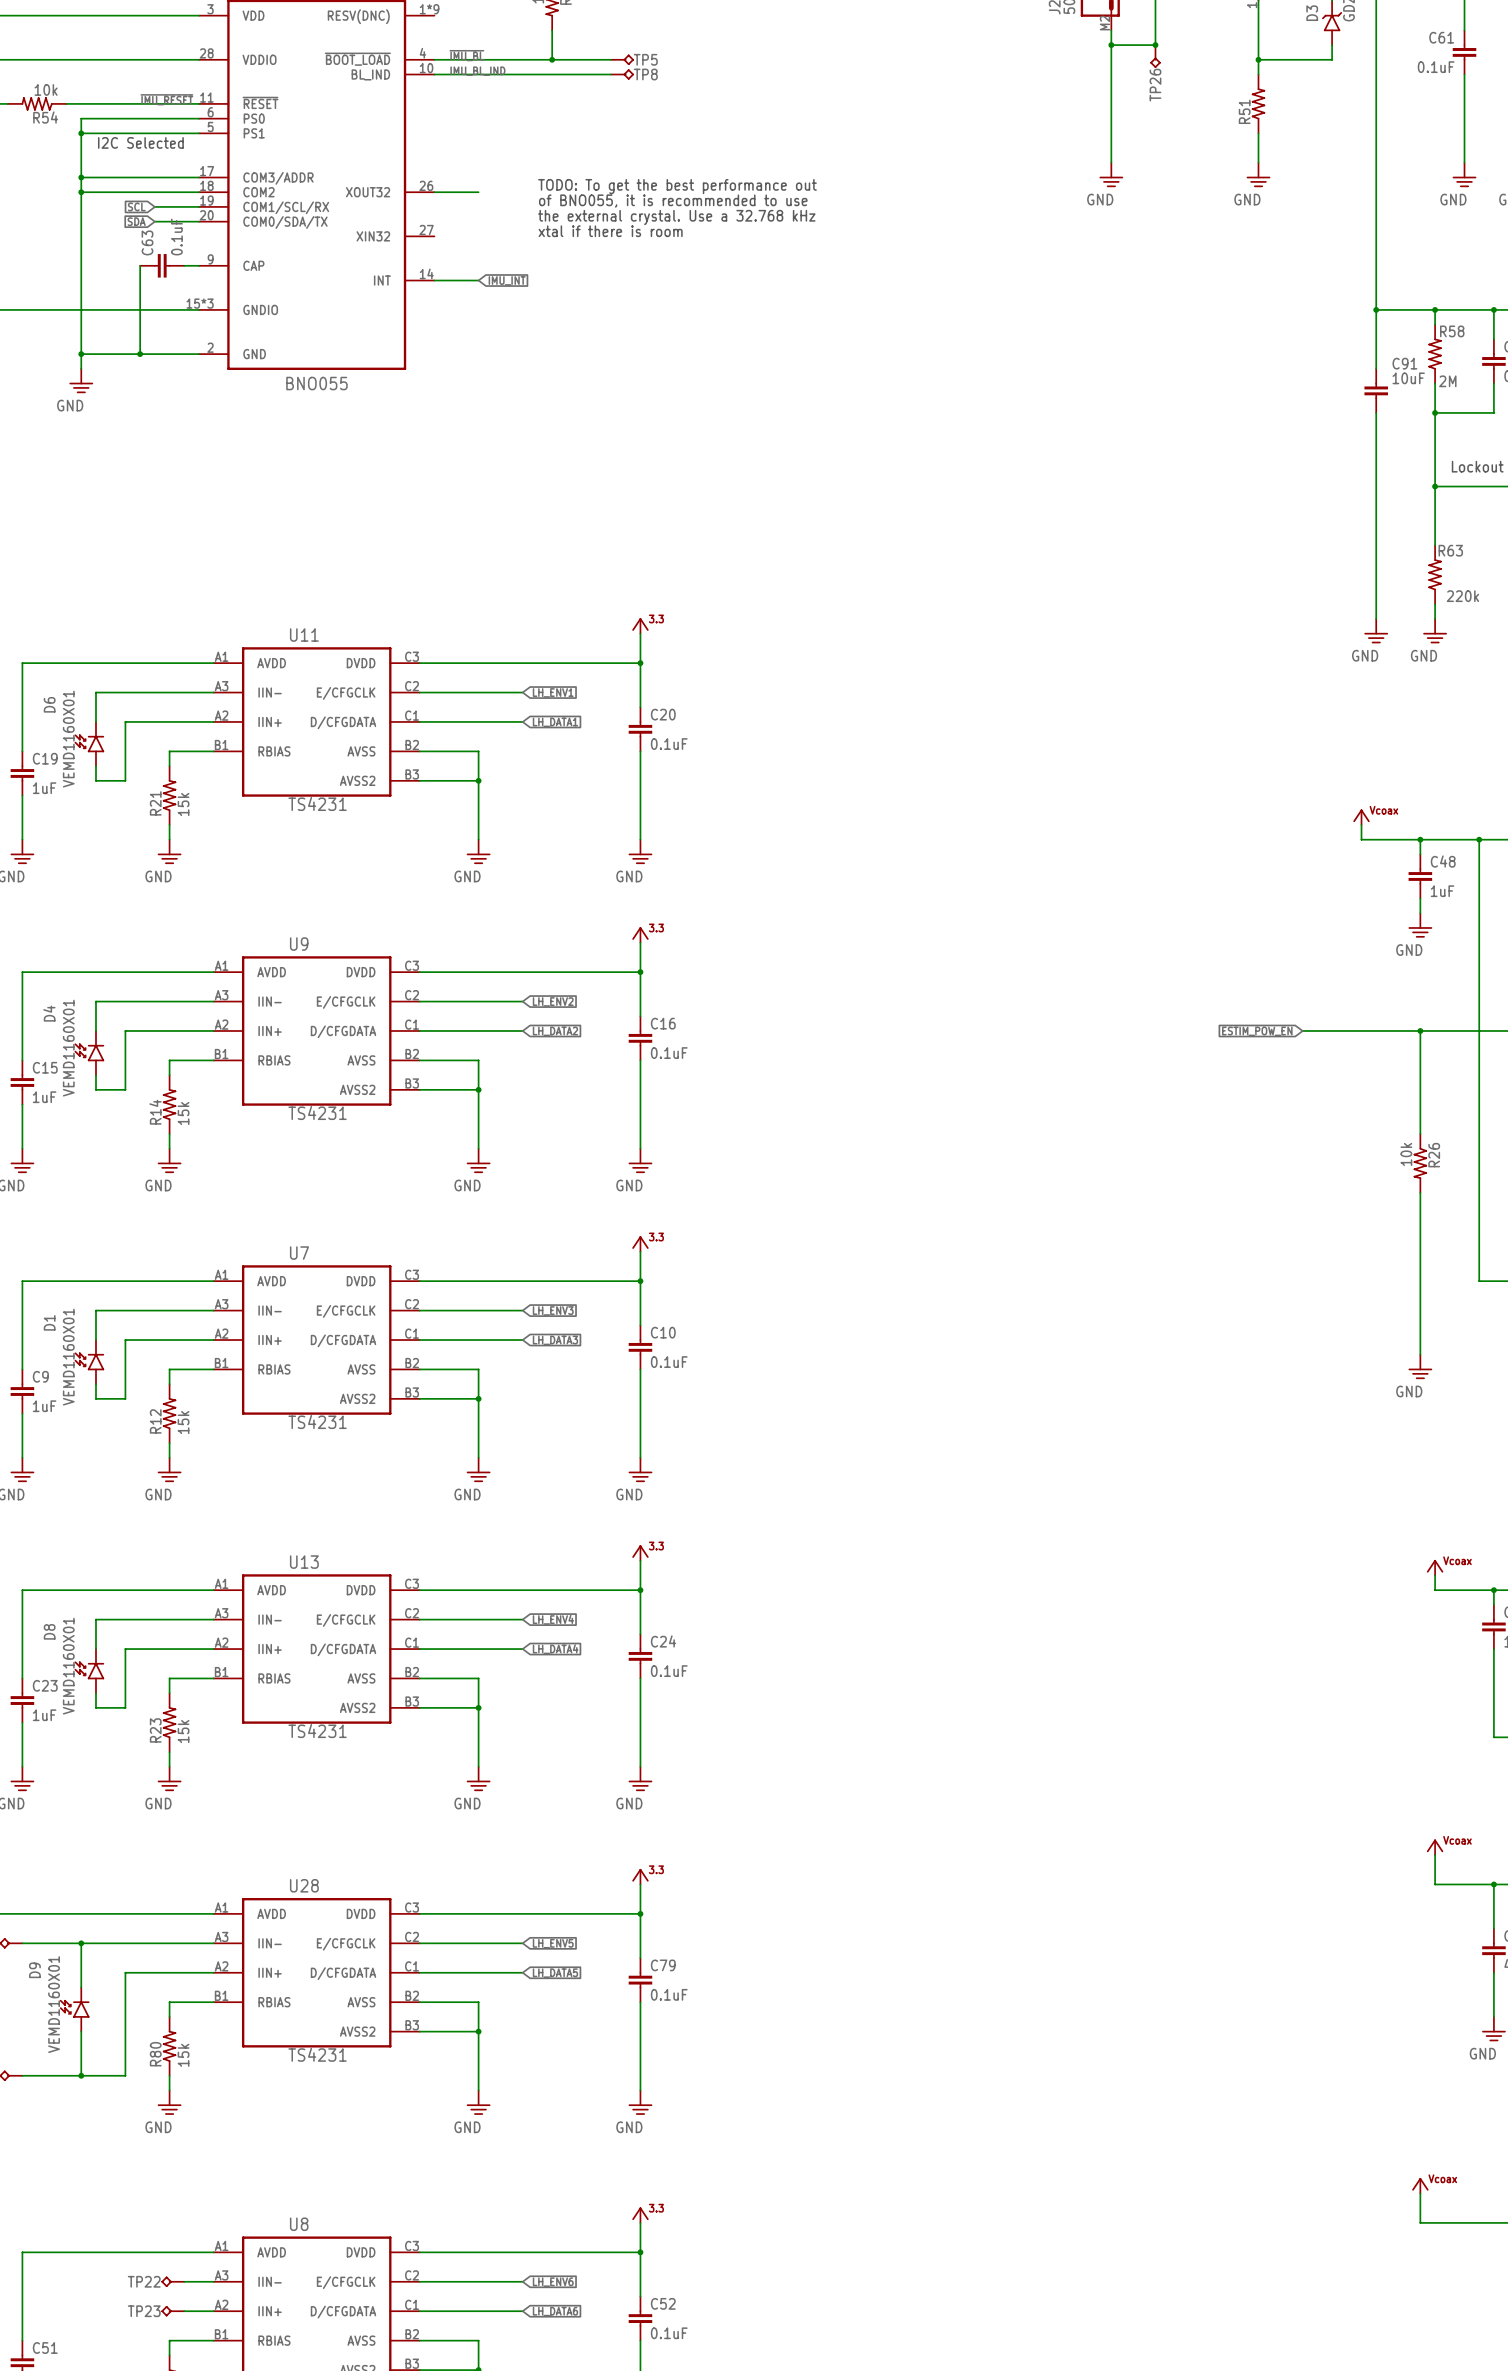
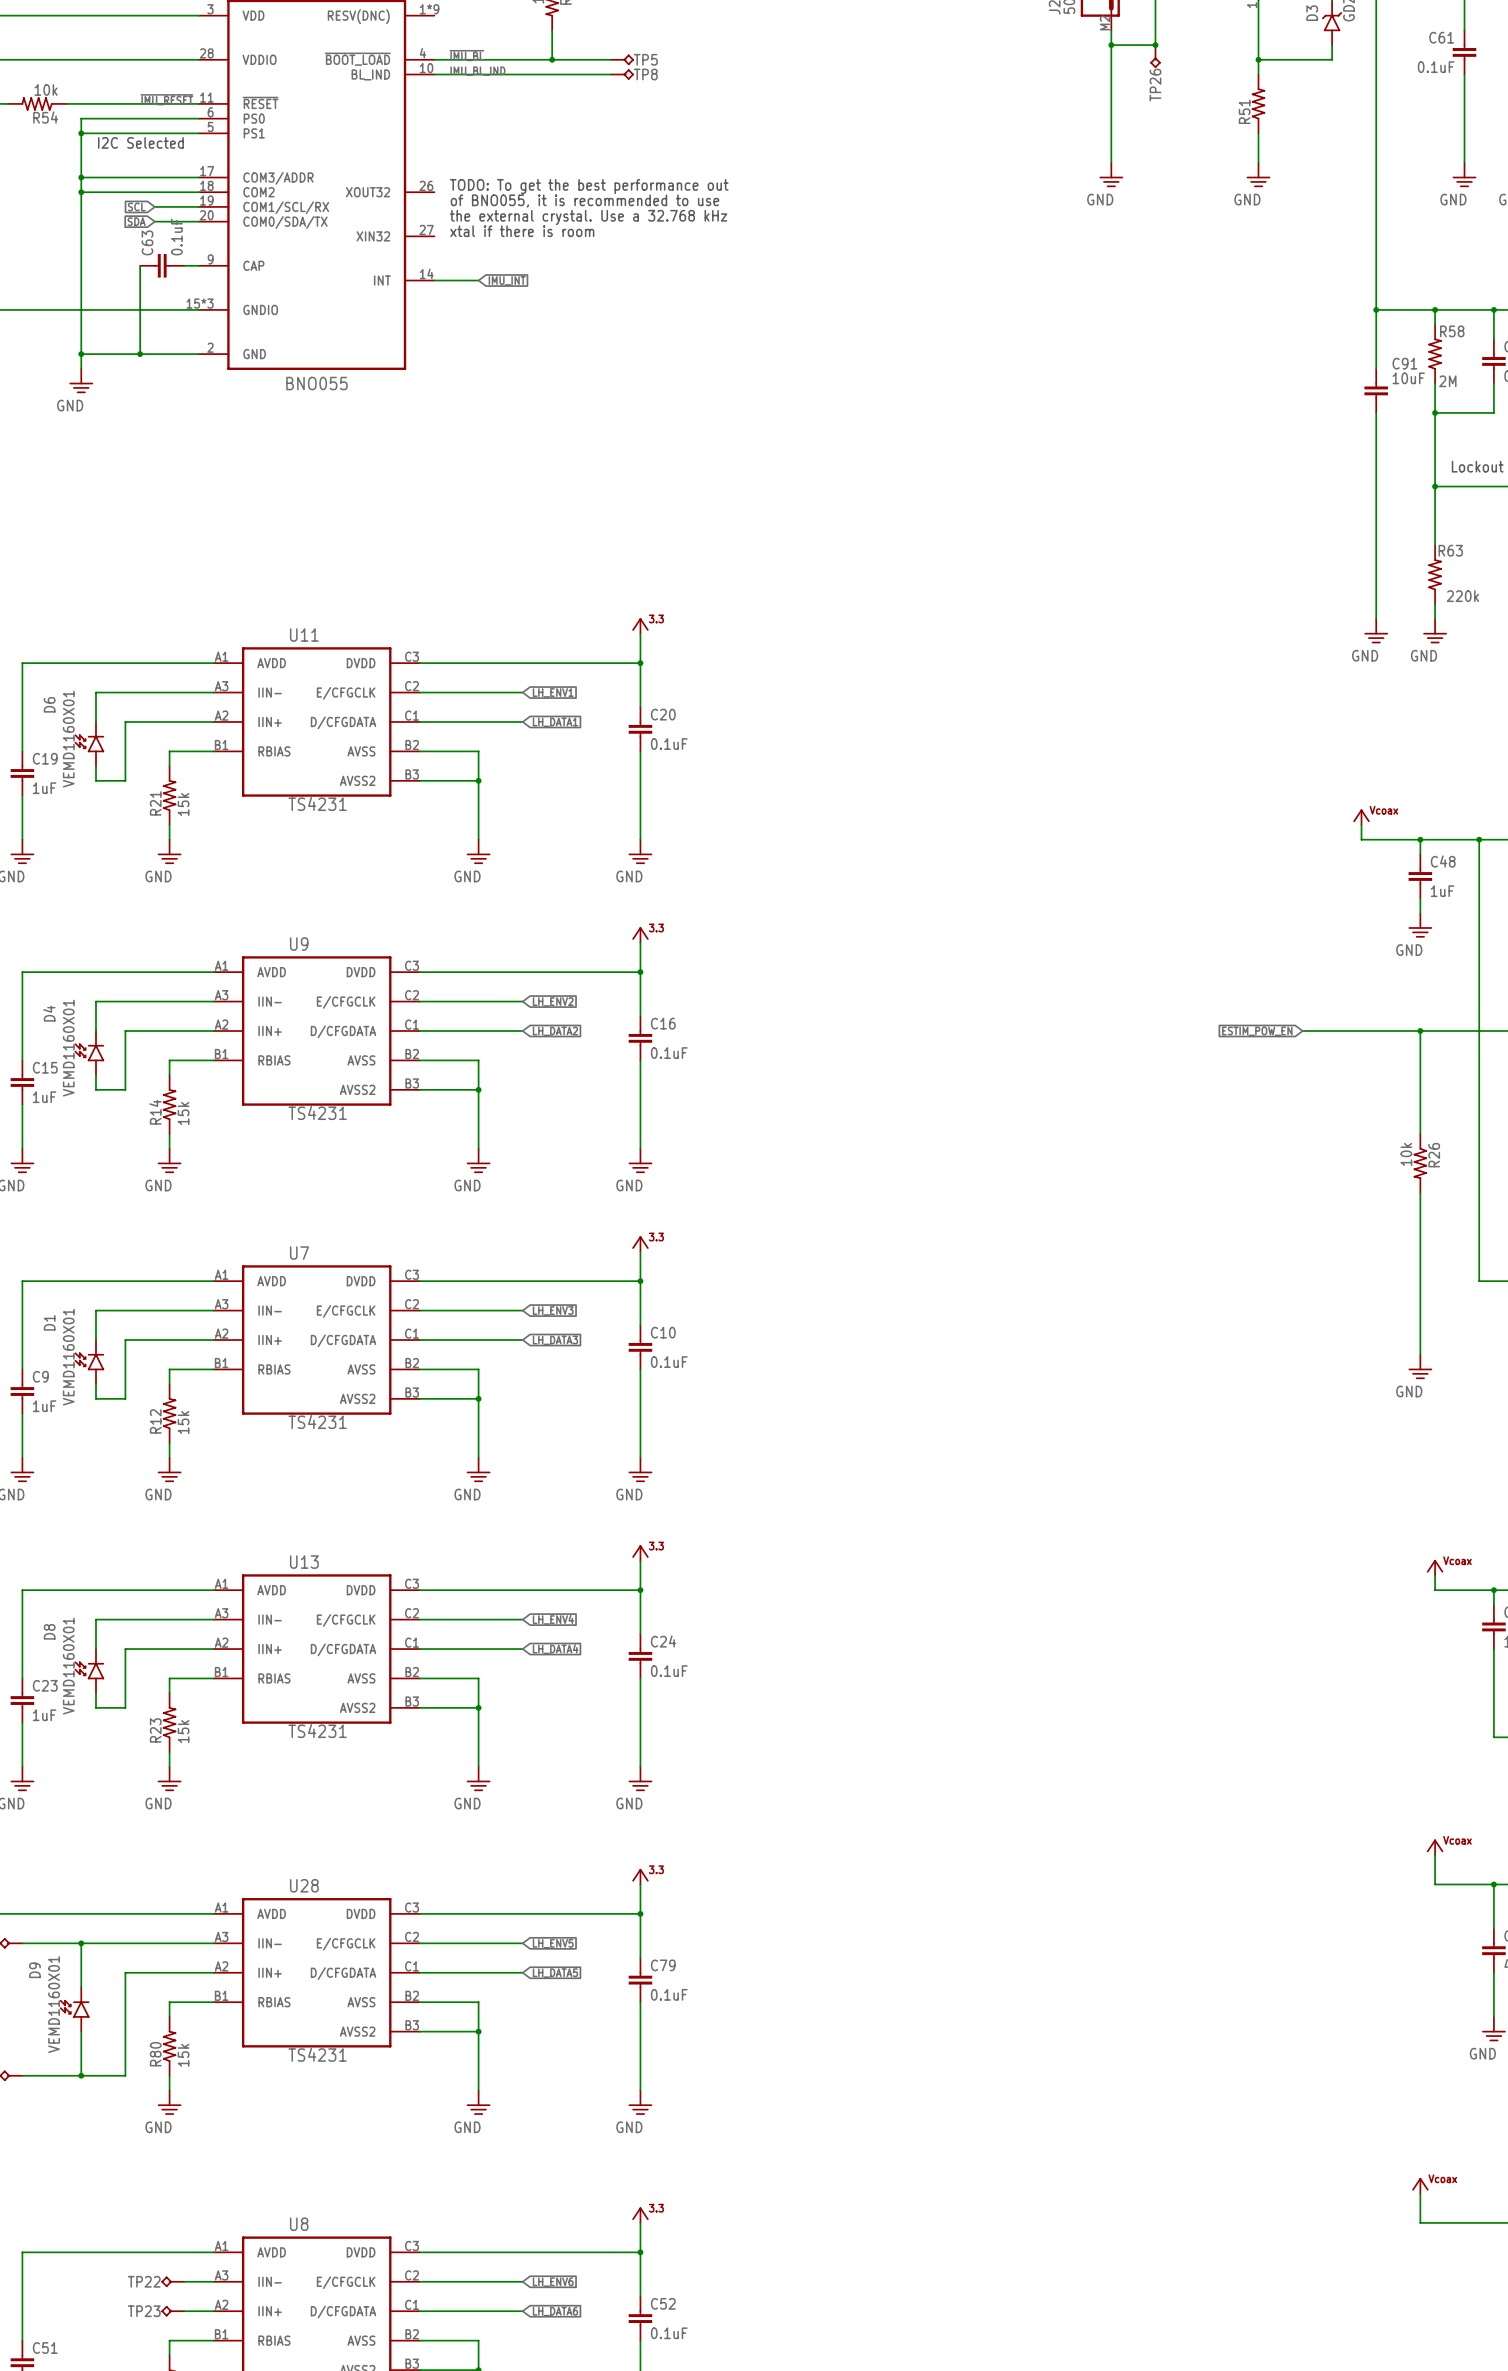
text position: TODO: To get the best performance out (677, 186) -> TODO: To get the best performance out (589, 186)
wire: (434, 192) (478, 192) -> none
text position: of BNO055, it is recommended to use (673, 201) -> of BNO055, it is recommended to use (585, 201)
text position: the external crystal. Use a 32.768 kHz (676, 217) -> the external crystal. Use a 32.768 kHz (588, 217)
text position: xtal if there is room (610, 231) -> xtal if there is room (522, 231)

